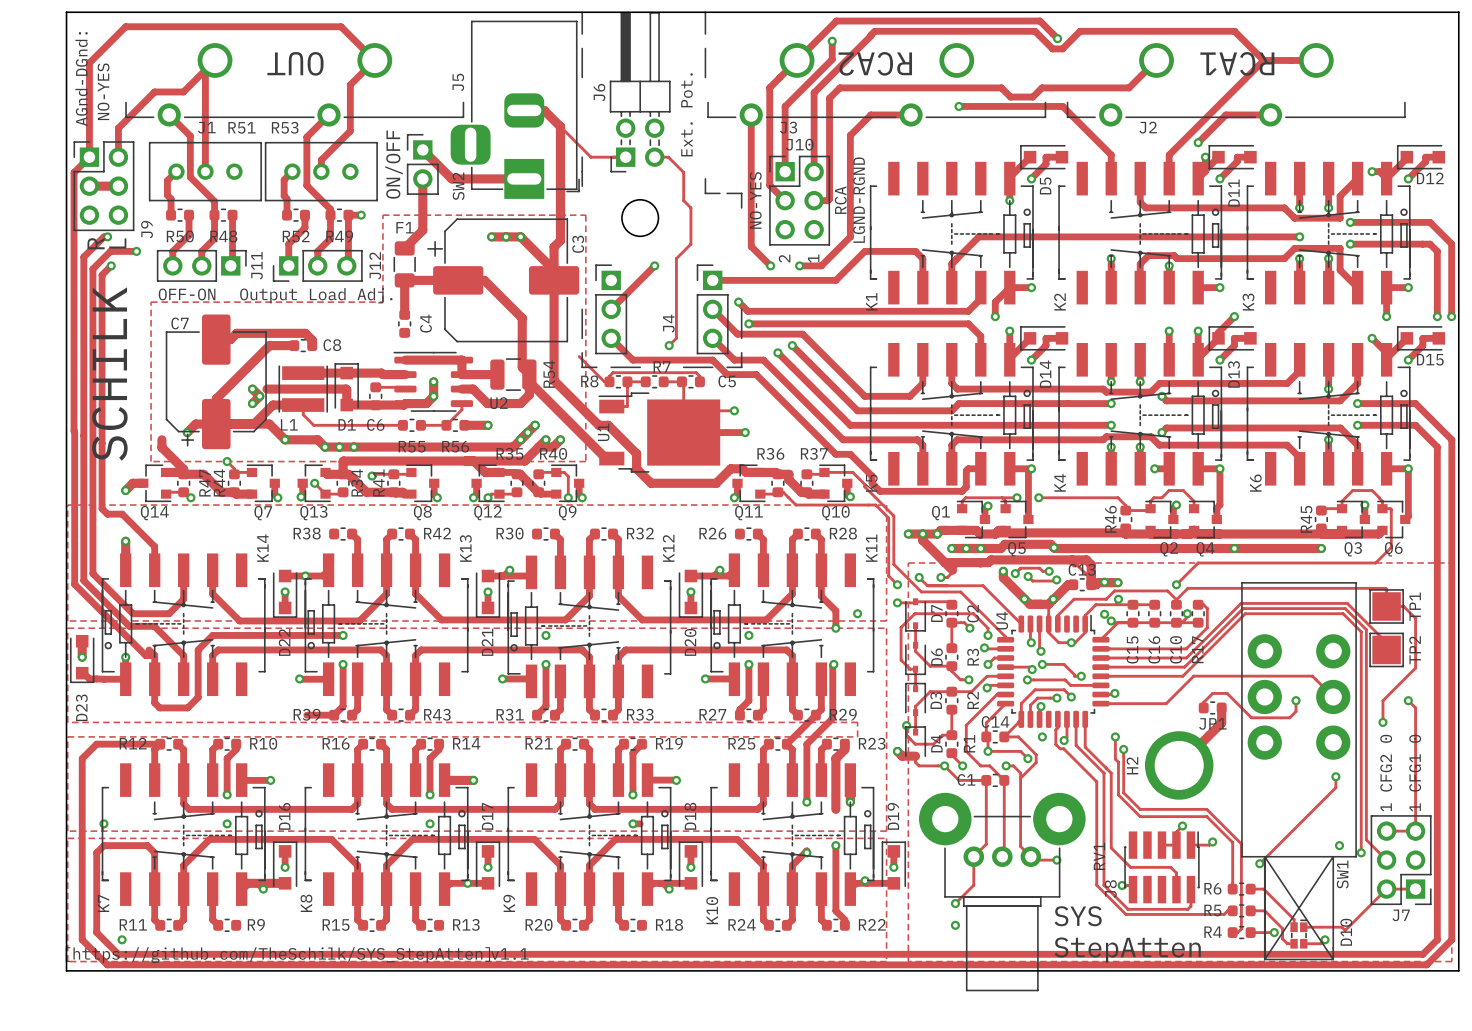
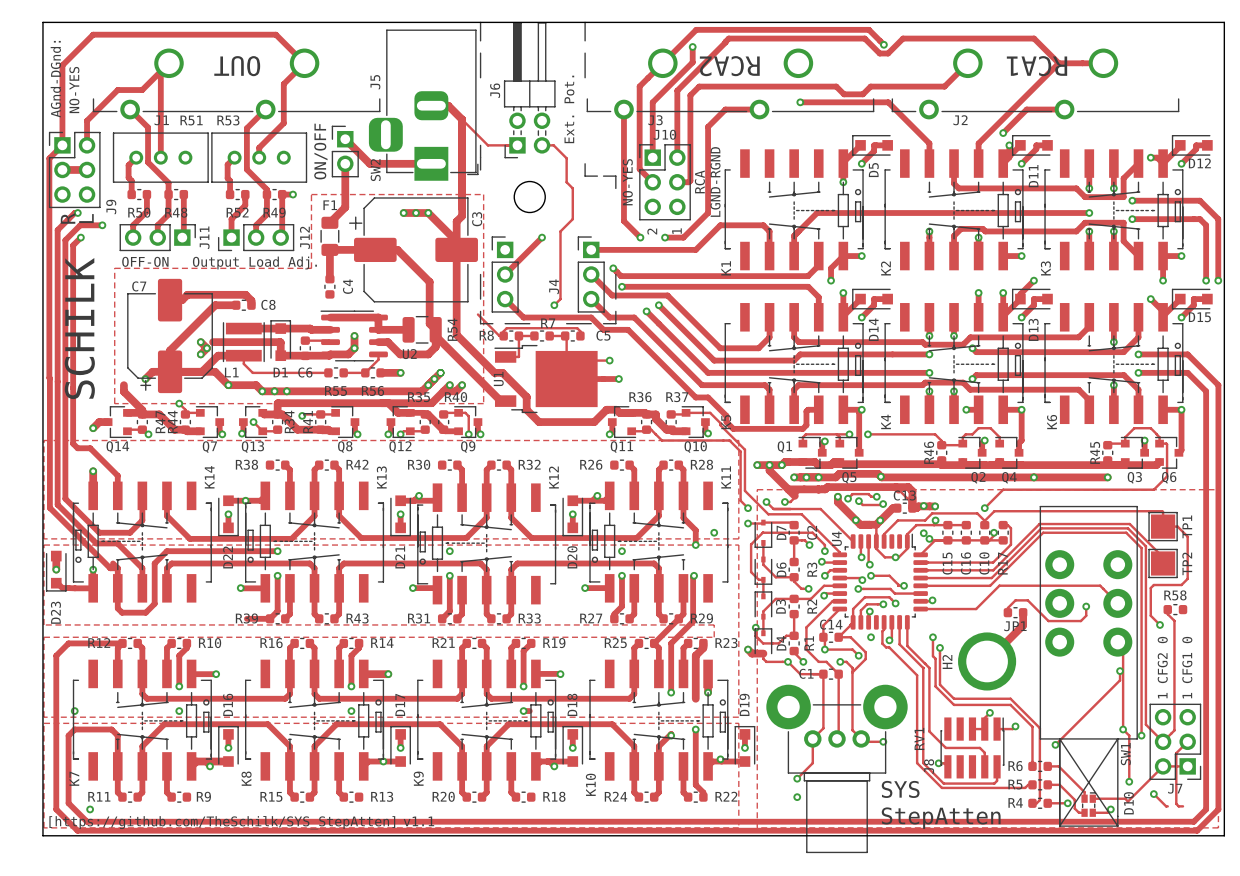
track: (1408, 675) (1382, 700) (1382, 722) -> (1181, 585) (1153, 585) (1150, 588) (1150, 615) (1160, 624)
track: (1408, 700) (1415, 707) (1415, 831) (1386, 831) -> none
via: (1408, 700) -> none
track: none -> (1167, 609) (1167, 614) (1174, 620) (1174, 730) (1163, 741)
R58: none -> (1175, 609)
track: none -> (1117, 642) (1123, 647) (1123, 729) (1129, 735) (1129, 781)
track: none -> (1187, 741) (1176, 753) (1176, 803) (1183, 806)
via: none -> (1129, 781)
track: none -> (1153, 794) (1167, 806)
via: none -> (1153, 794)

